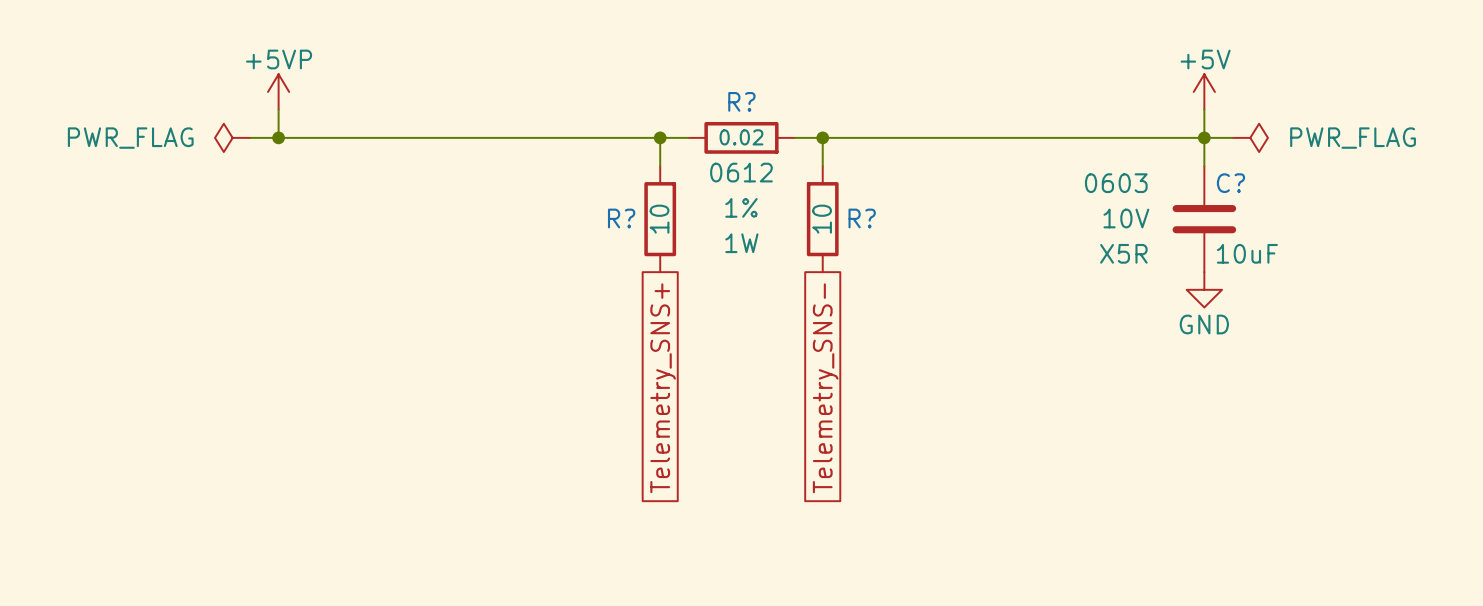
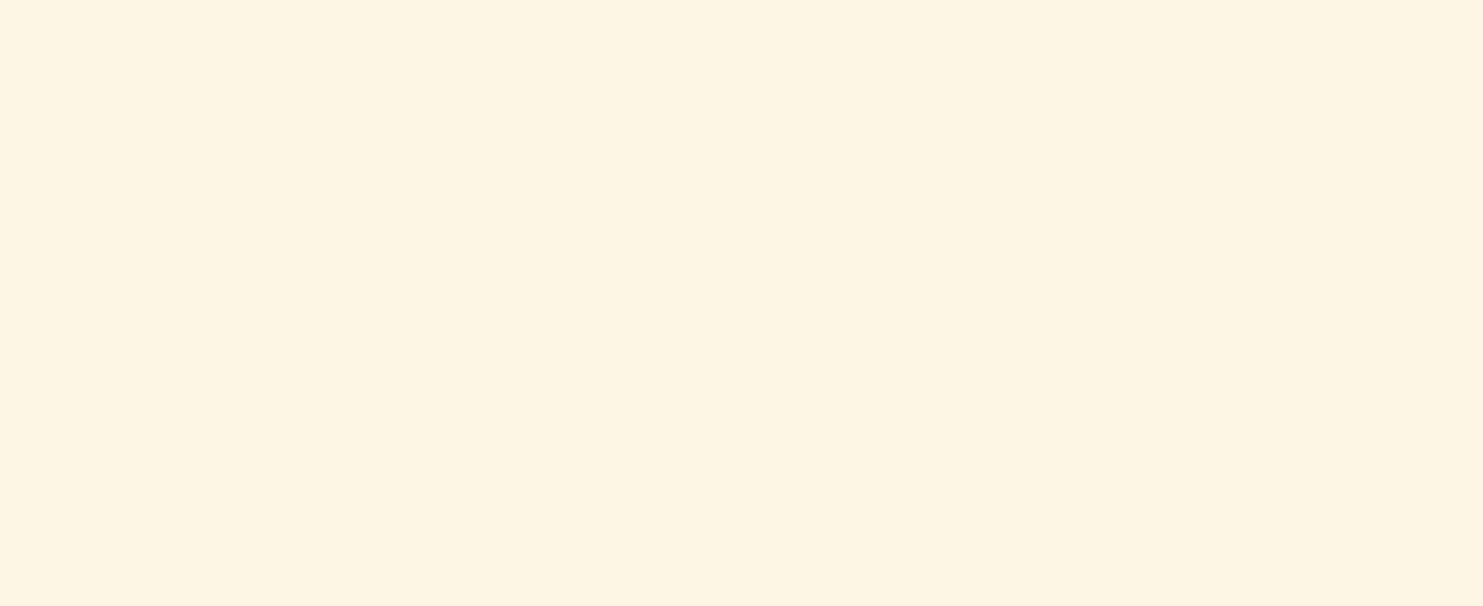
power symbol: +5VP (278, 91) -> none
power symbol: +5V (1204, 91) -> none
wire: (278, 109) (278, 137) -> none
wire: (1204, 109) (1204, 166) -> none
power symbol: PWR_FLAG (232, 137) -> none
wire: (250, 137) (688, 137) -> none
junction: (278, 137) -> none
wire: (660, 137) (660, 166) -> none
junction: (660, 137) -> none
R?: 0.02 (741, 137) -> none
wire: (794, 137) (1232, 137) -> none
wire: (822, 137) (822, 166) -> none
junction: (822, 137) -> none
junction: (1204, 137) -> none
power symbol: PWR_FLAG (1250, 137) -> none
R?: 10 (660, 219) -> none
R?: 10 (822, 219) -> none
C?: 10uF (1204, 219) -> none
power symbol: GND (1204, 289) -> none
global label: Telemetry_SNS+ (663, 388) -> none
global label: Telemetry_SNS- (825, 388) -> none

